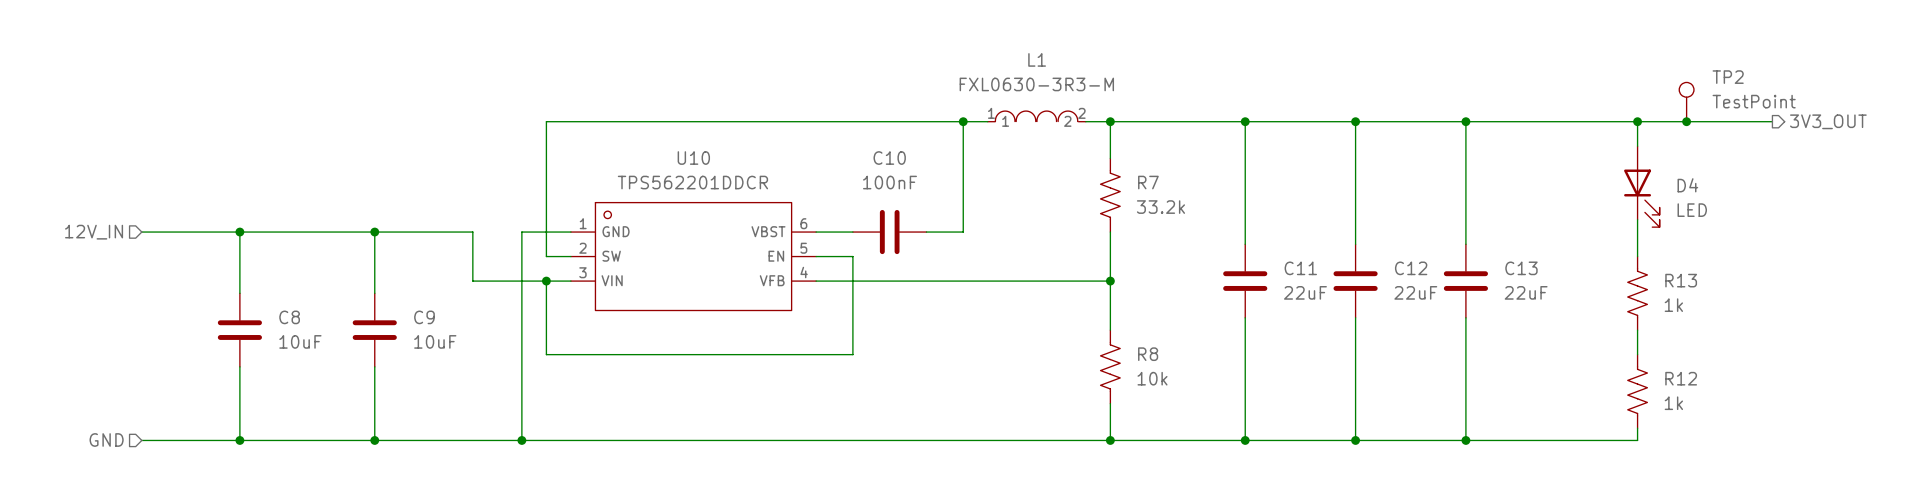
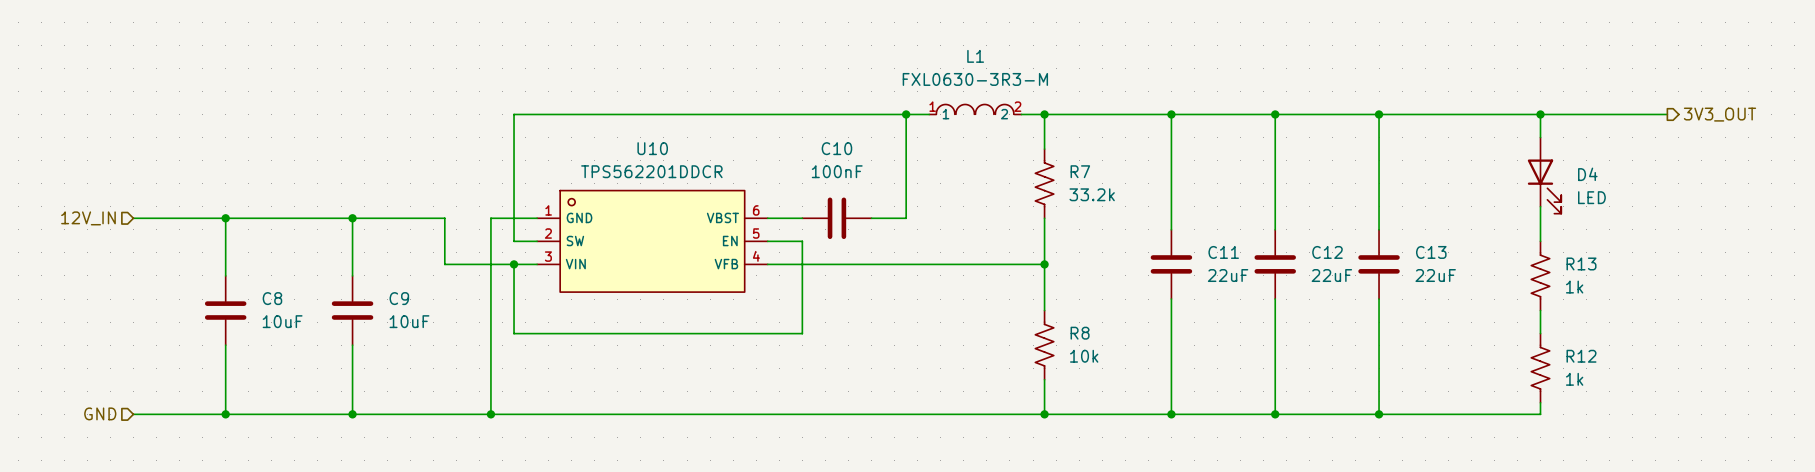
TP2: TestPoint (1686, 102) -> none
junction: (1686, 121) -> none

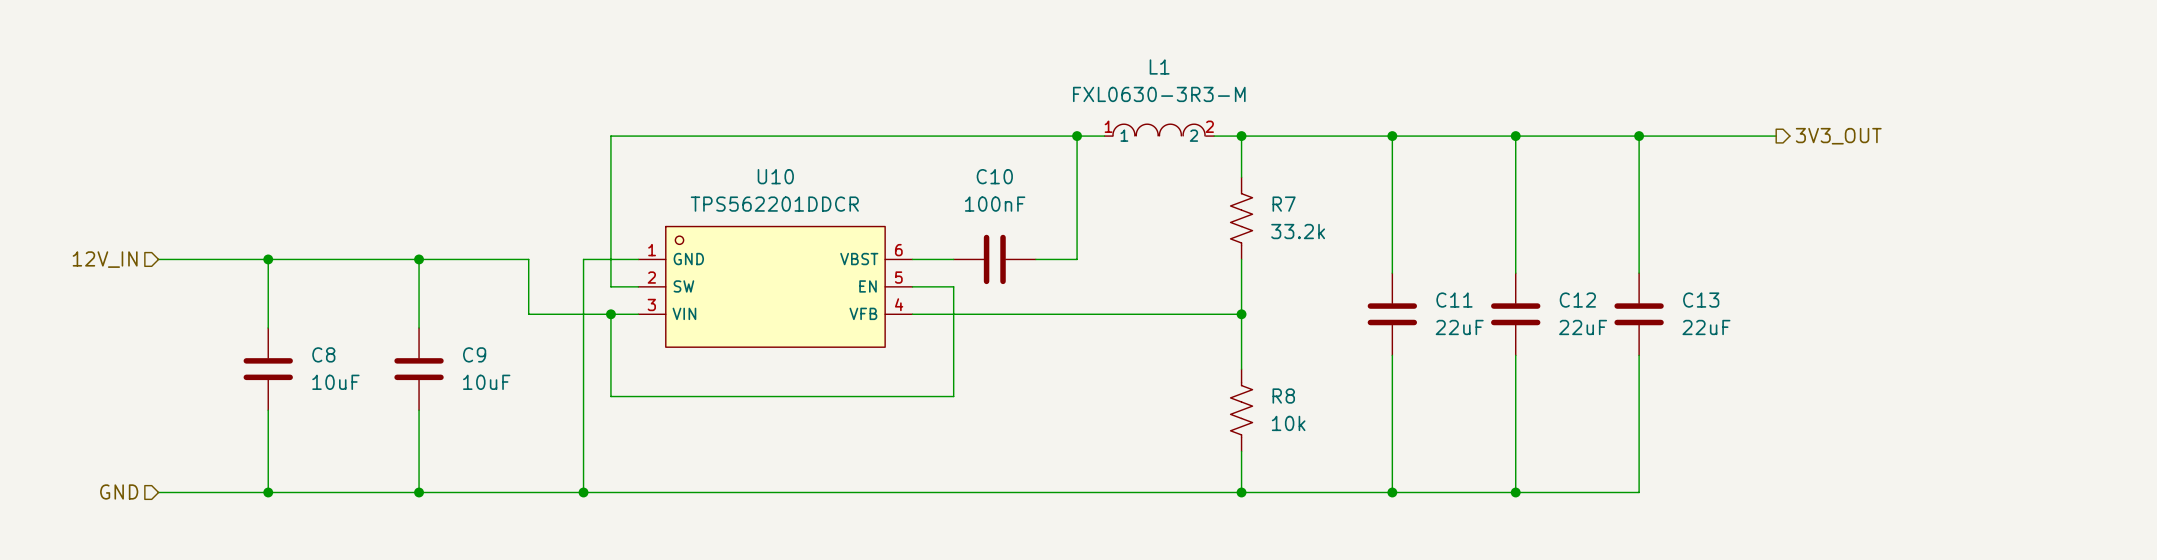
wire: (1494, 114) (1667, 114) -> none
wire: (1540, 114) (1540, 137) -> none
junction: (1540, 114) -> none
hierarchical label position: 3V3_OUT (1719, 114) -> 3V3_OUT (1838, 136)
D4: LED (1544, 175) -> none
wire: (1540, 206) (1540, 241) -> none
R13: 1k (1540, 275) -> none
wire: (1540, 310) (1540, 333) -> none
R12: 1k (1540, 368) -> none
wire: (1540, 402) (1540, 414) (1379, 414) -> none
junction: (1379, 414) -> none

